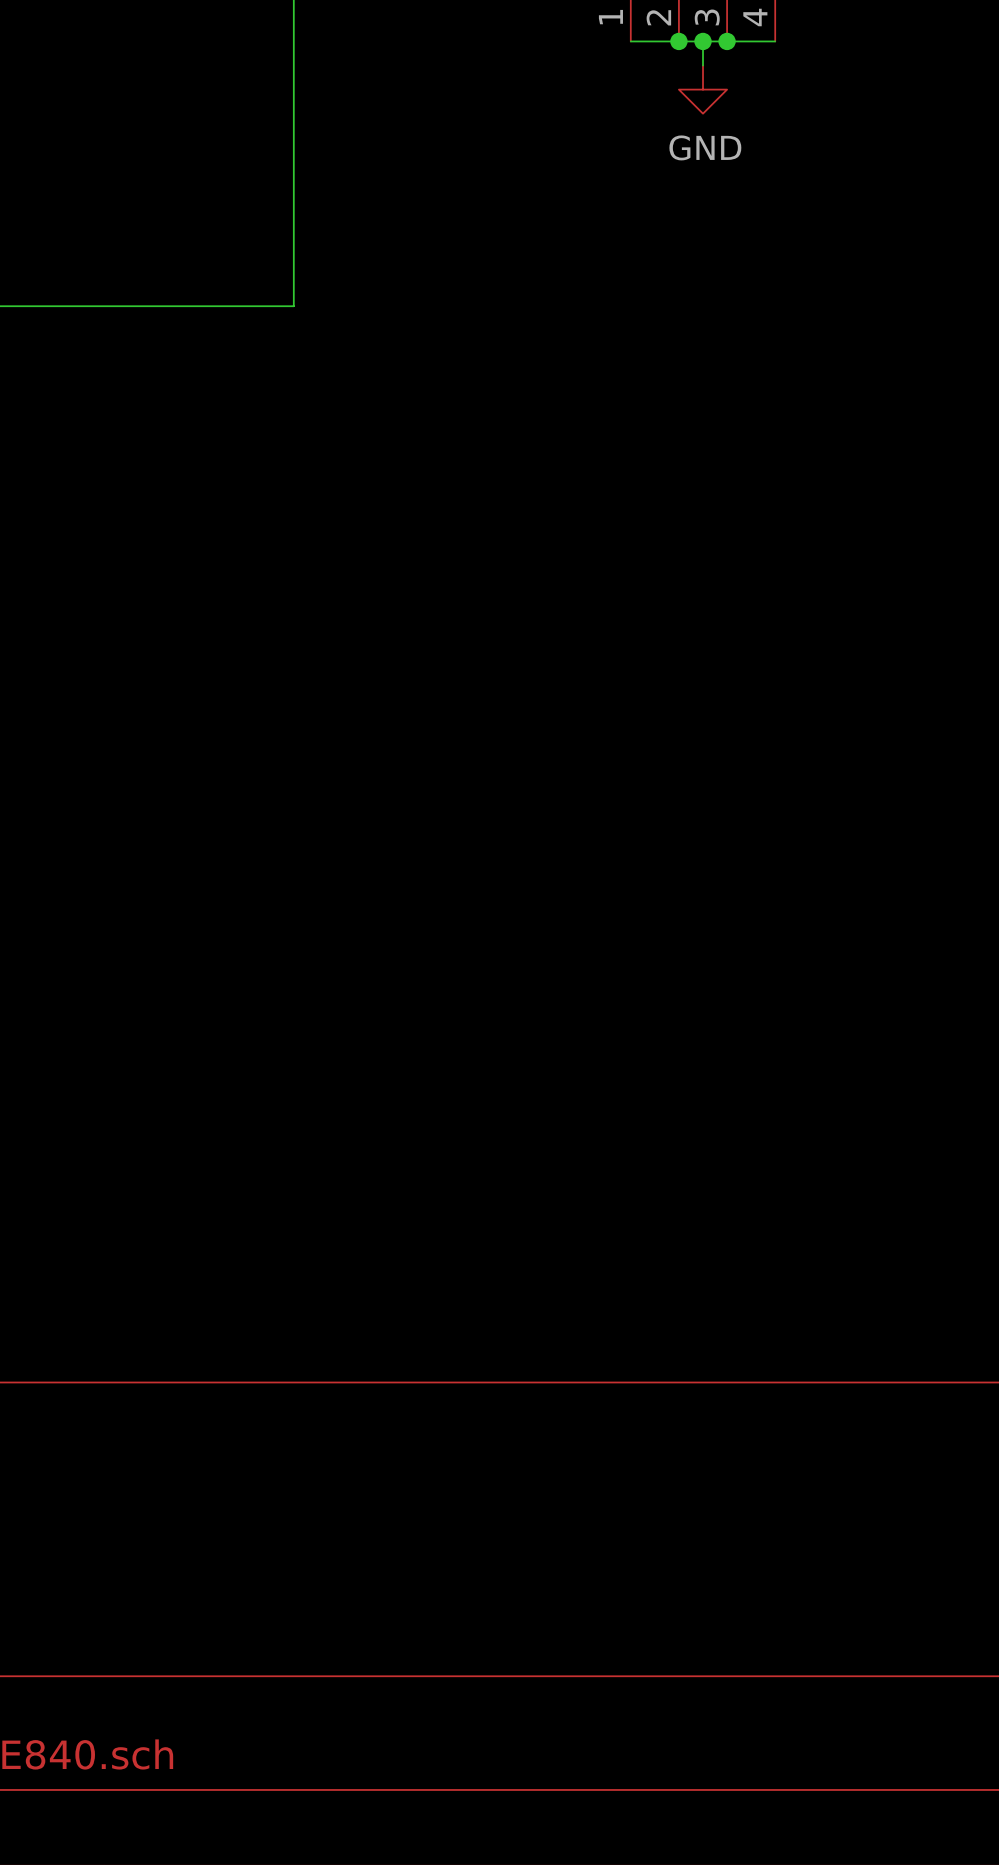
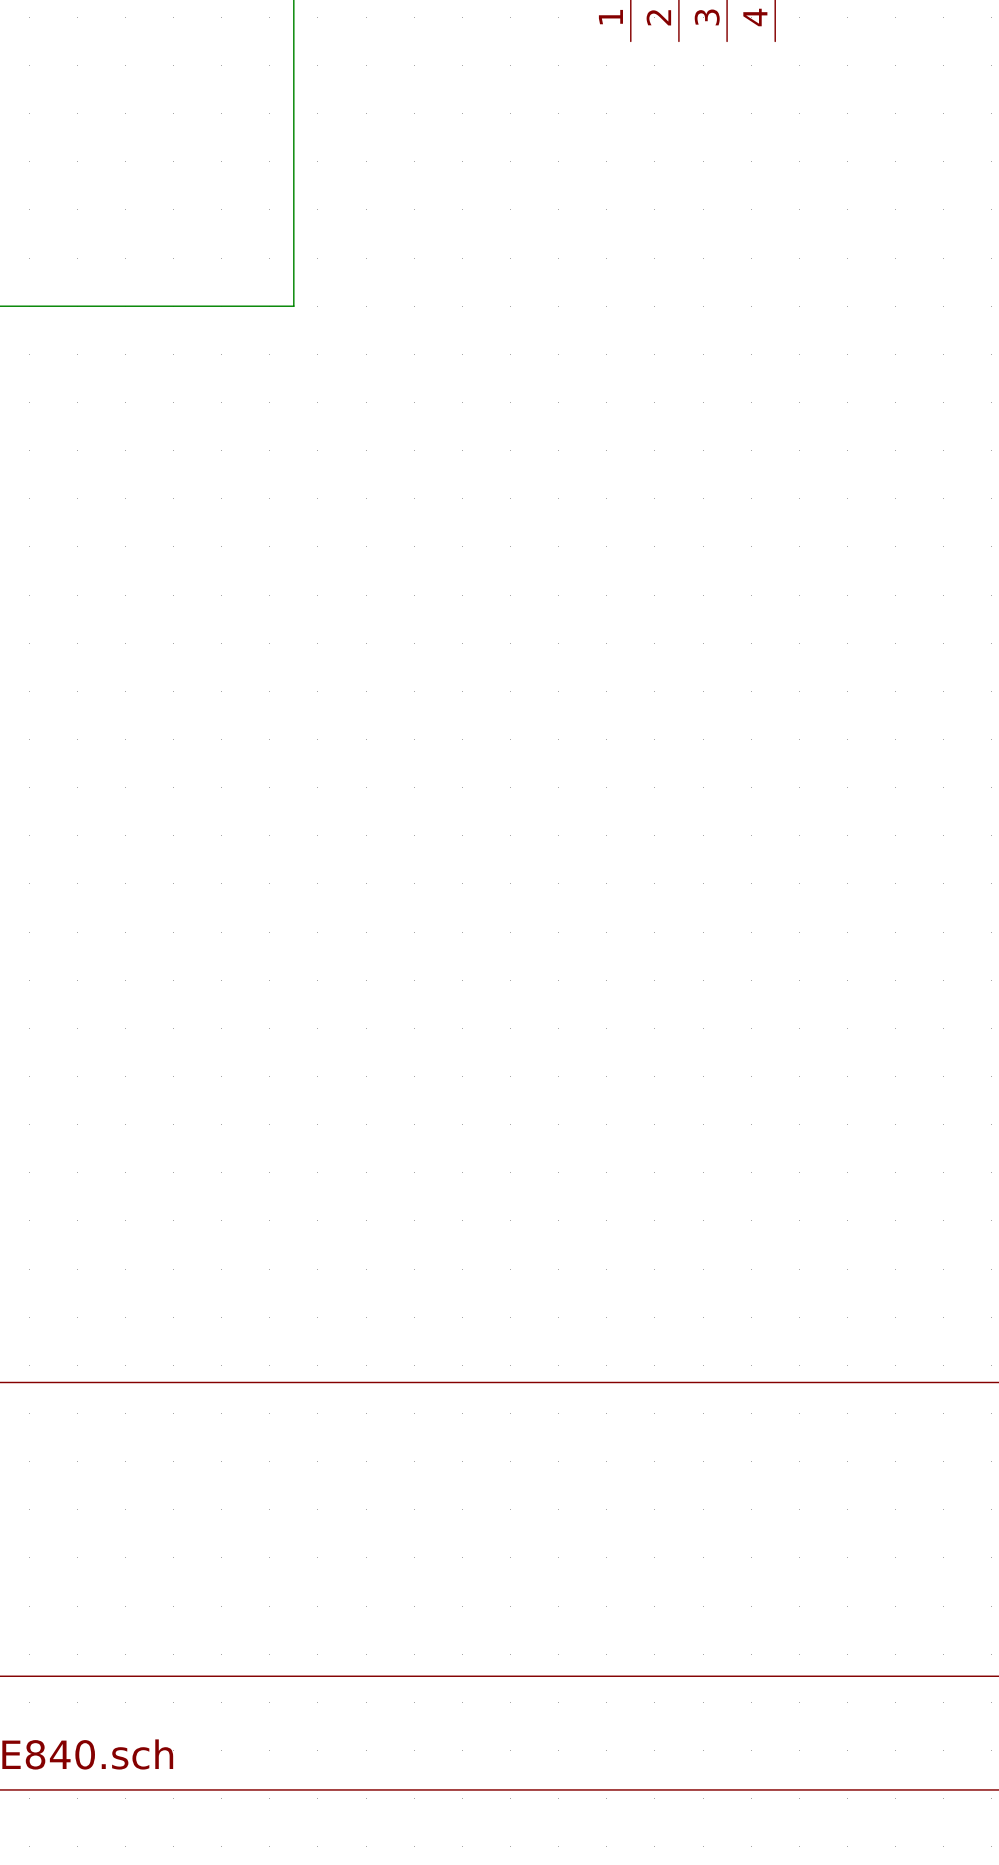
wire: (630, 41) (775, 41) -> none
junction: (678, 41) -> none
wire: (703, 41) (703, 65) -> none
junction: (703, 41) -> none
junction: (727, 41) -> none
power symbol: GND (703, 89) -> none

